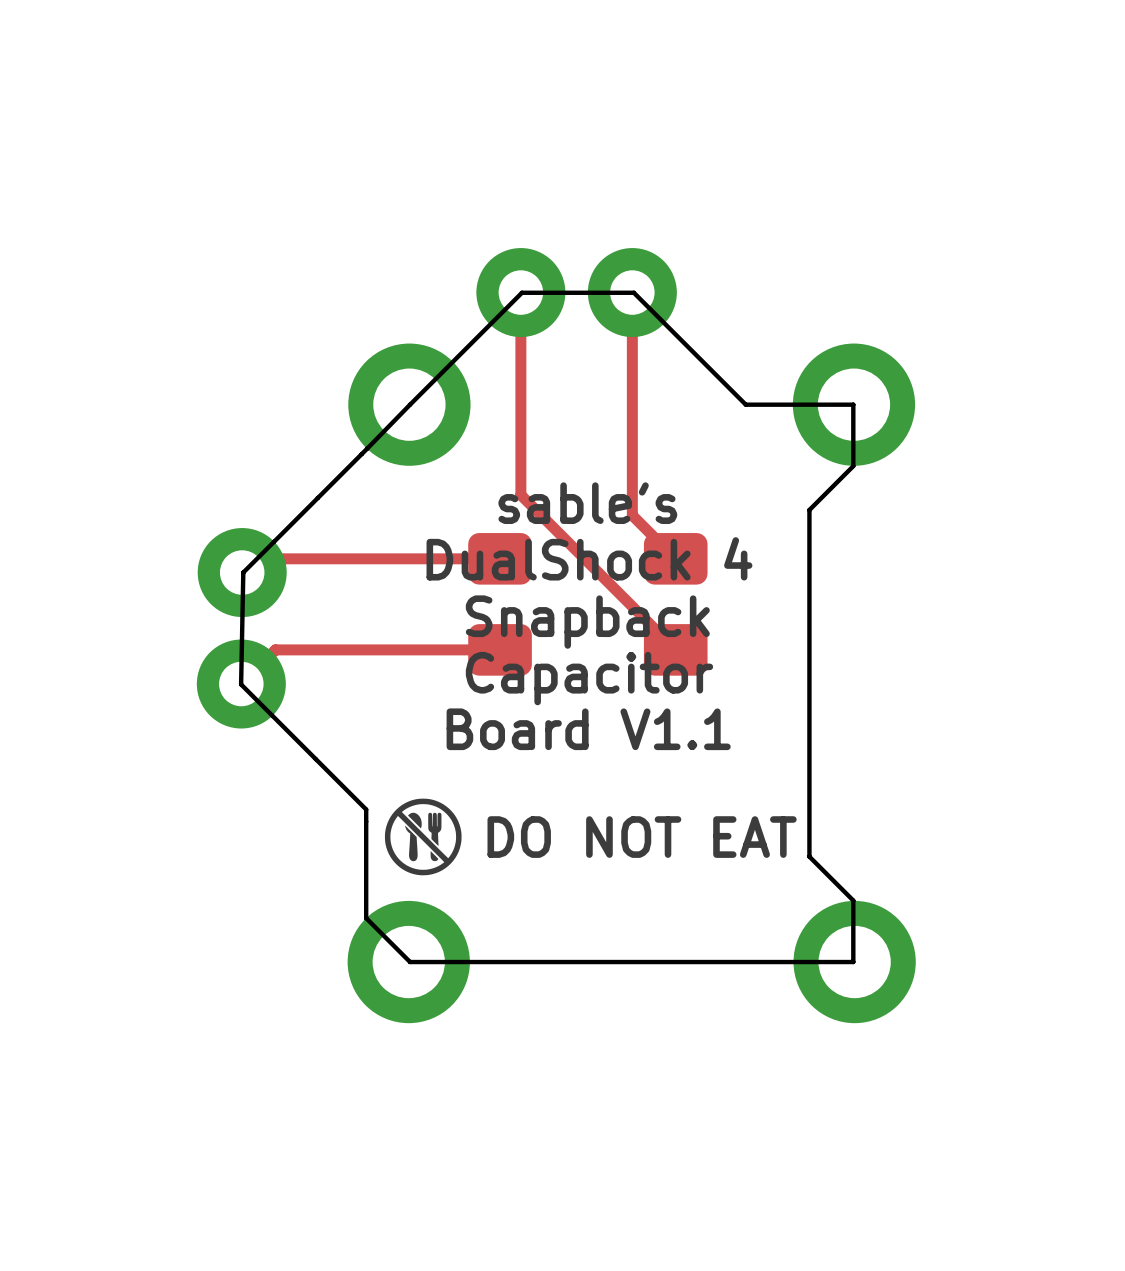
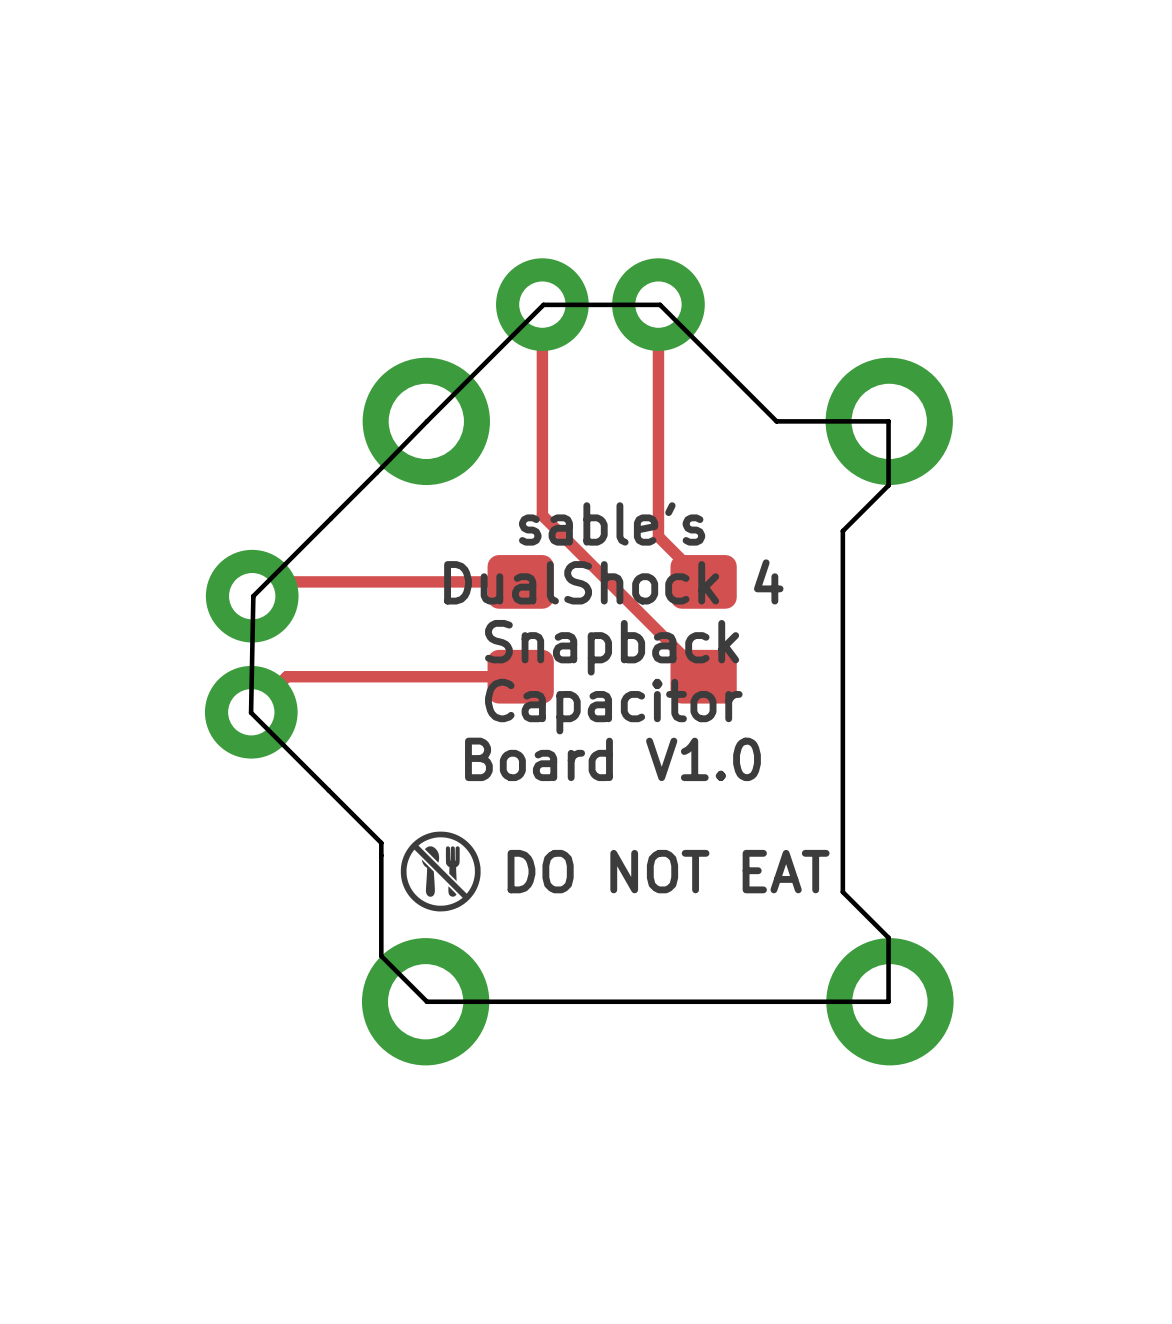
text: Board V1.1 (588, 729) -> Board V1.0 (612, 759)

